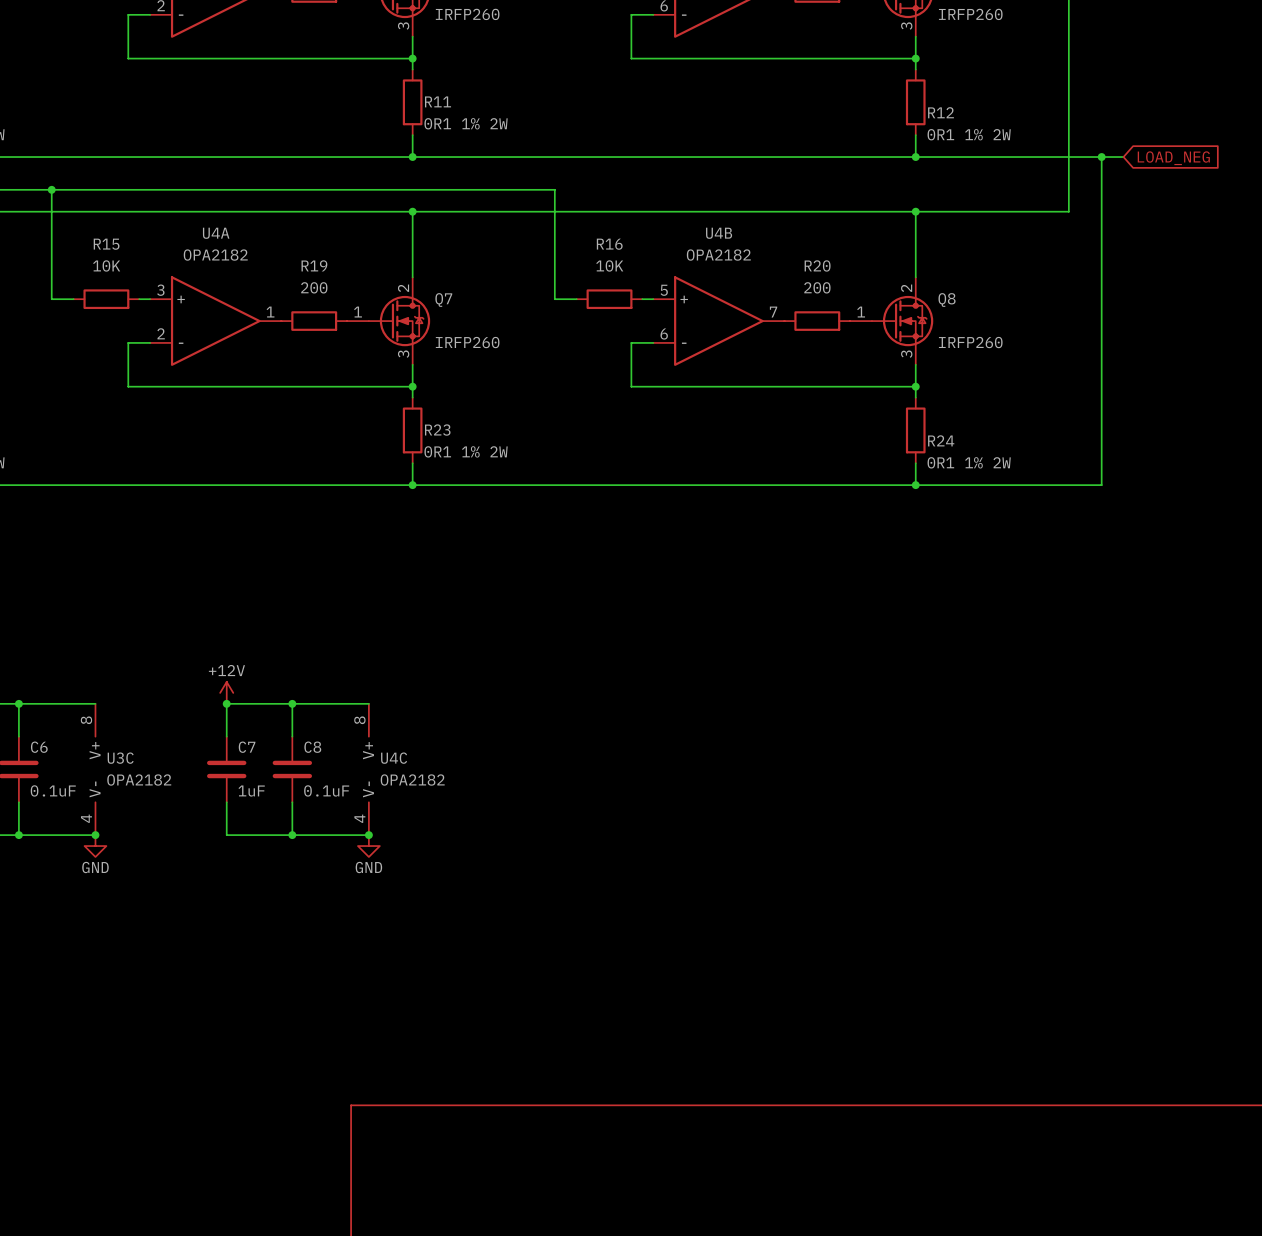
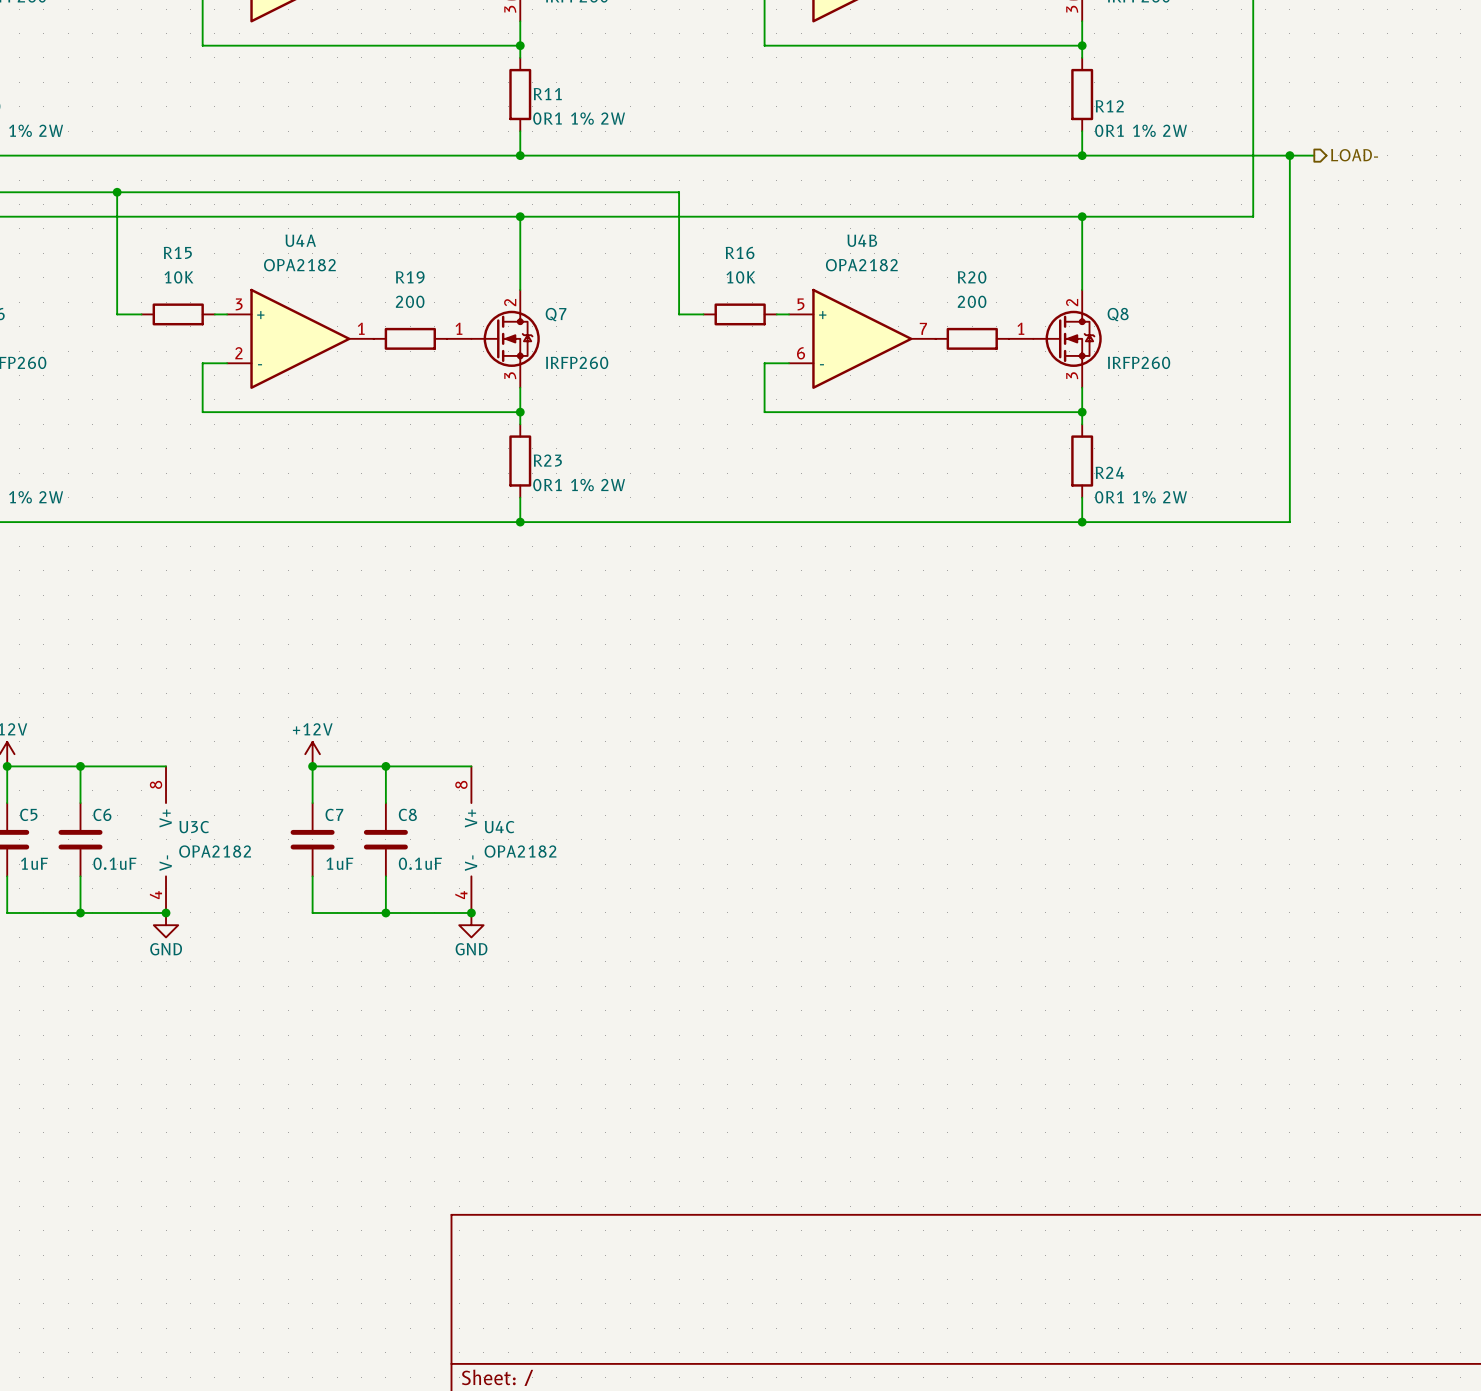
hierarchical label: none -> LOAD- (1354, 155)
global label: LOAD_NEG (1173, 158) -> none

